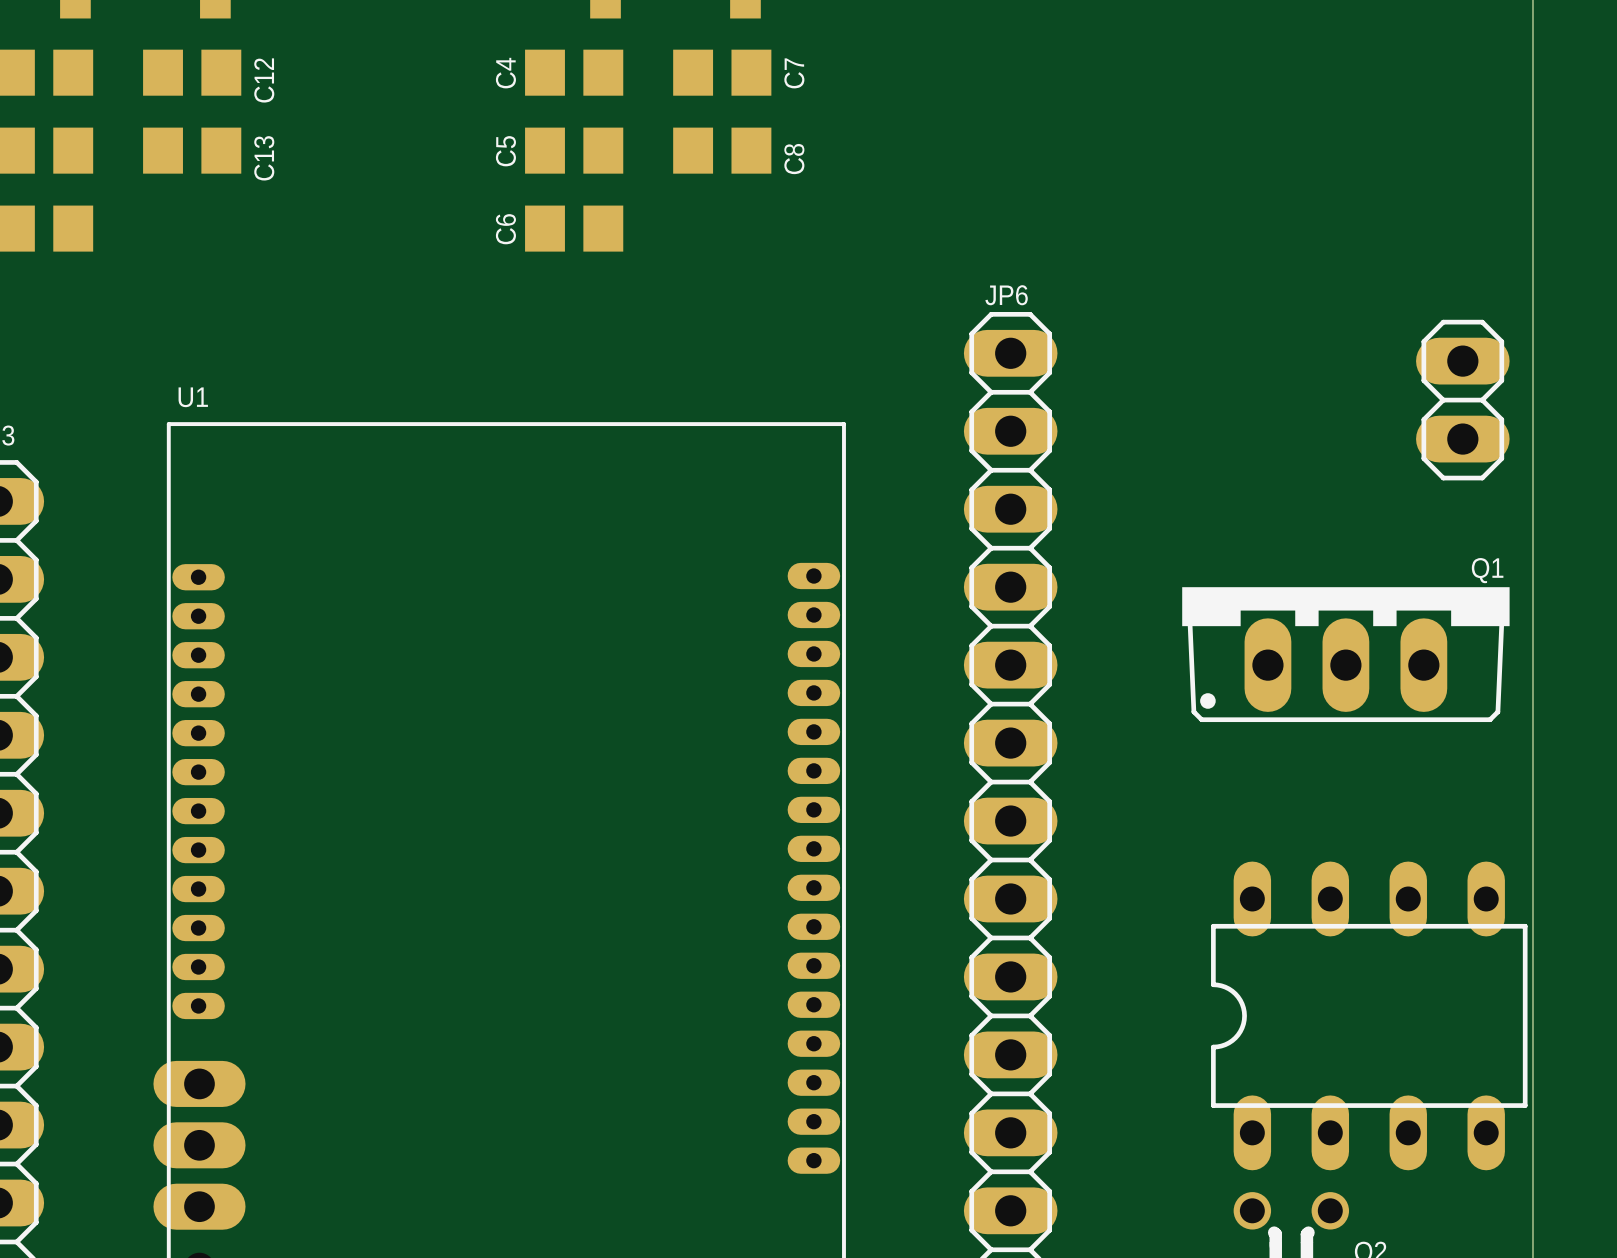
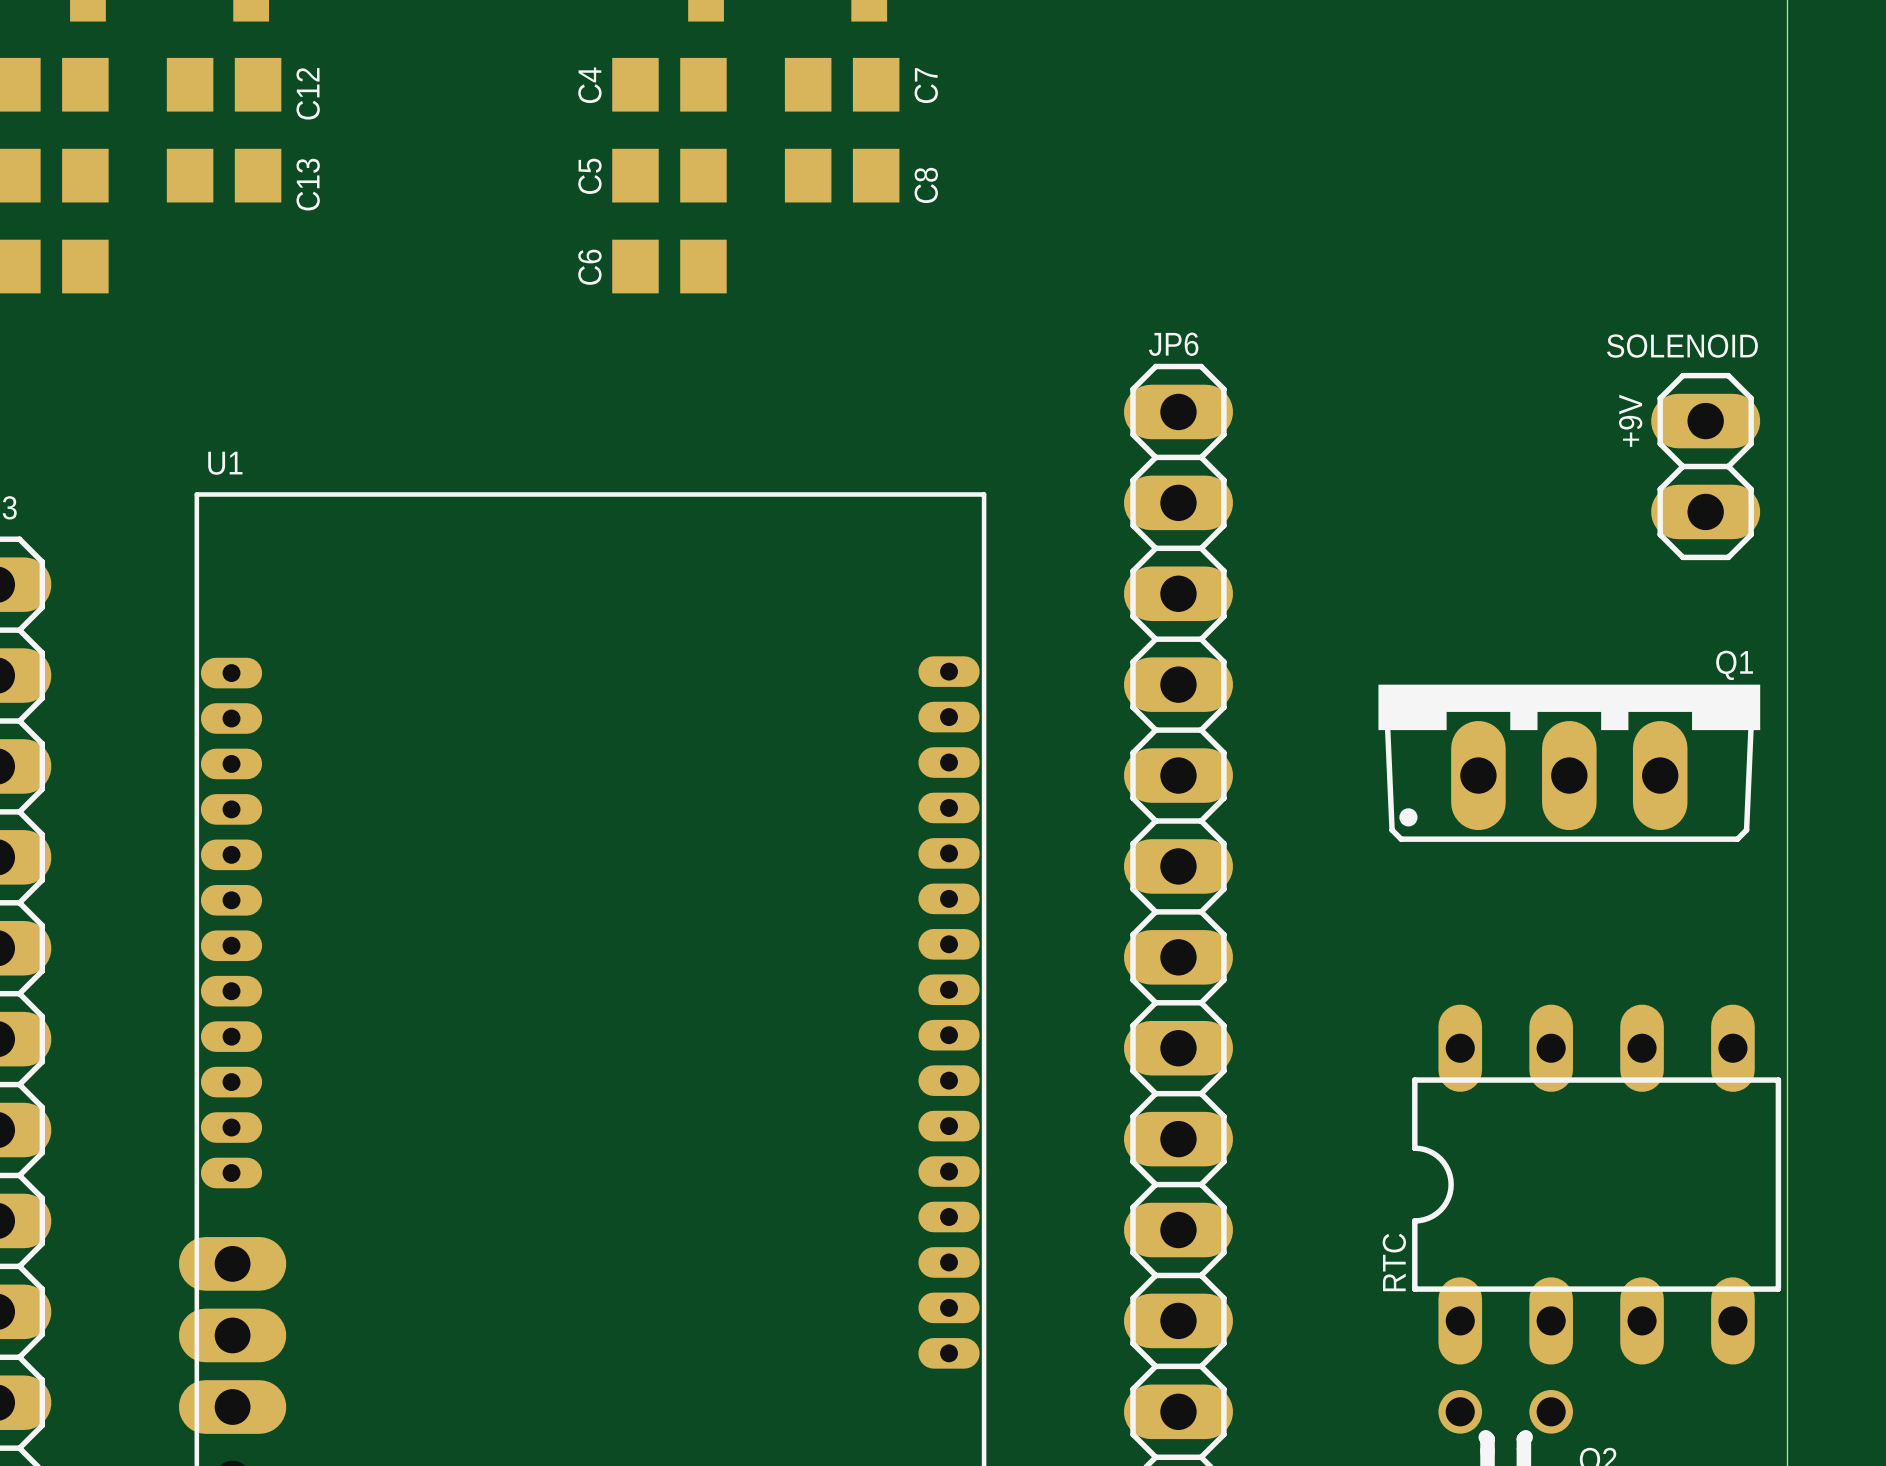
text: none -> SOLENOID (1682, 346)
text: none -> +9V (1630, 420)
text: none -> RTC (1394, 1262)

